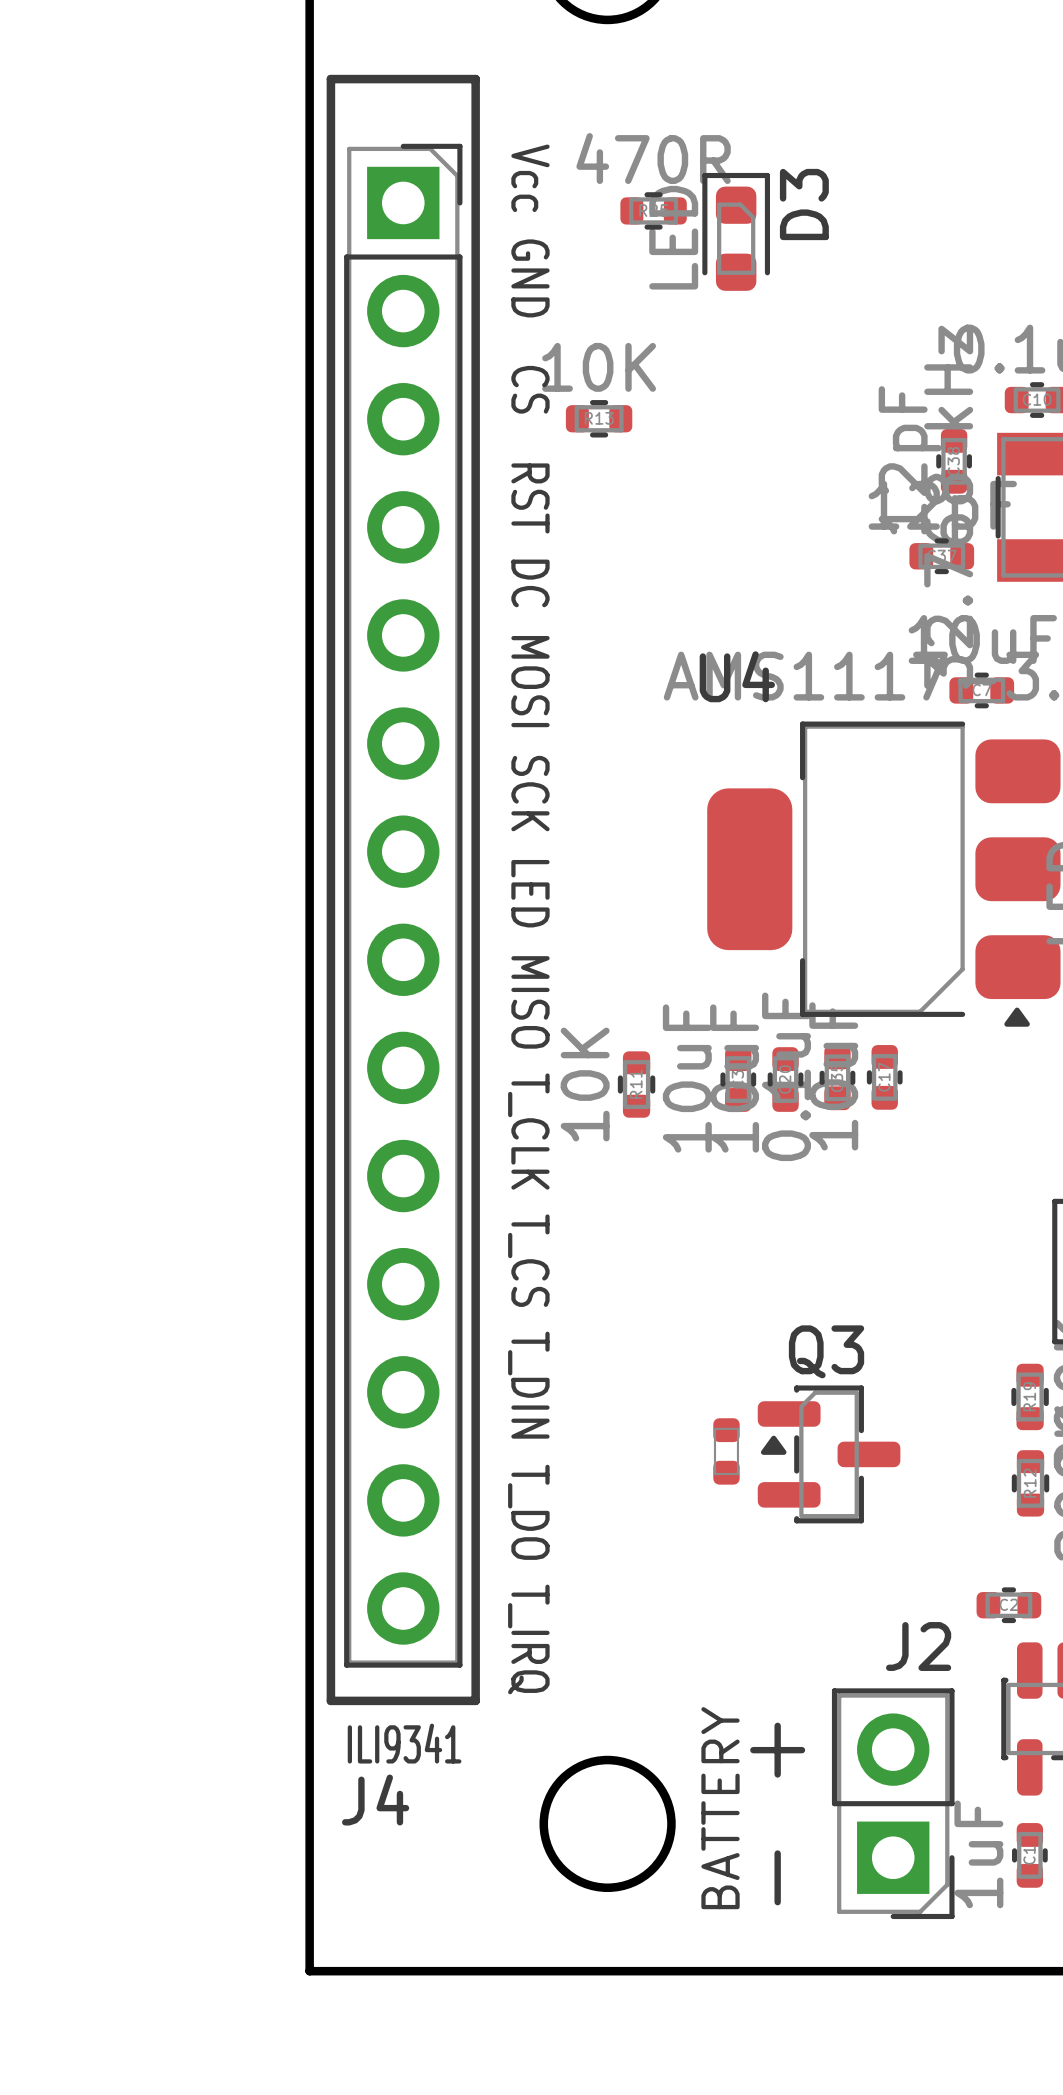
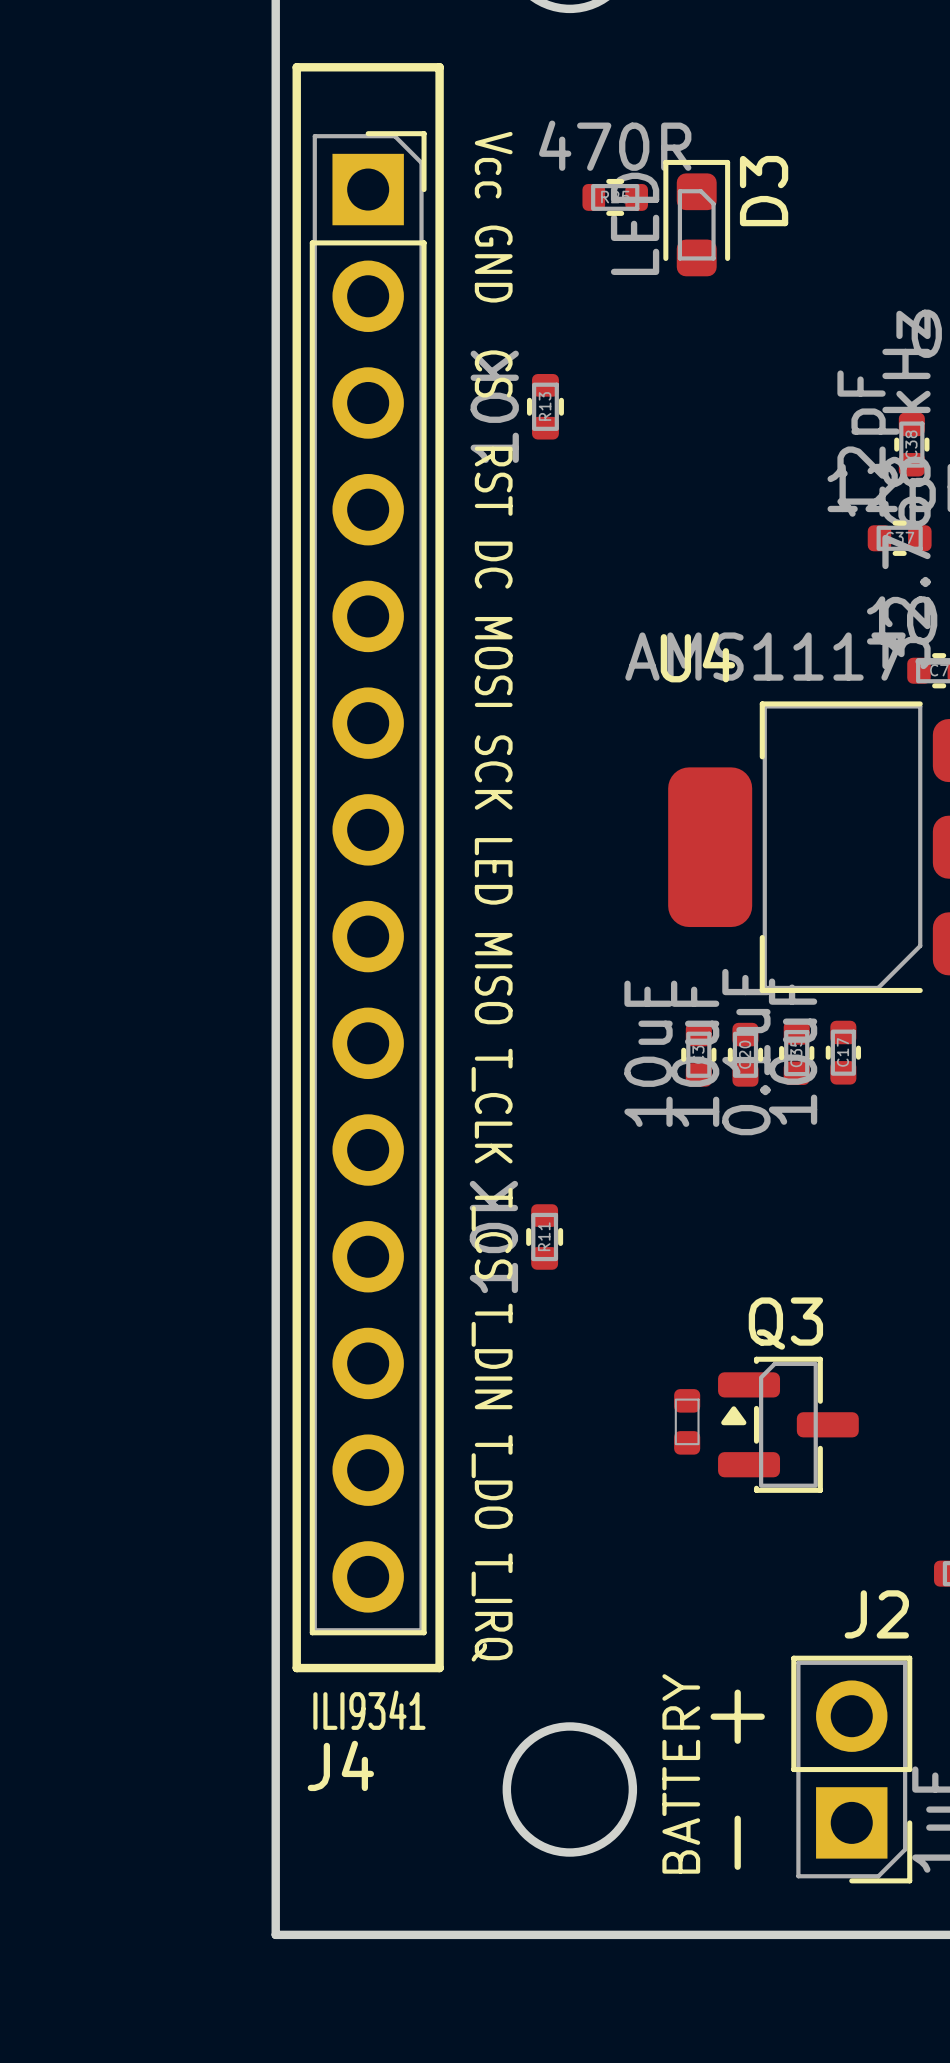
R13 rotation: 0° (599, 418) -> 90° clockwise (545, 406)
R11 position: (636, 1084) -> (544, 1236)

